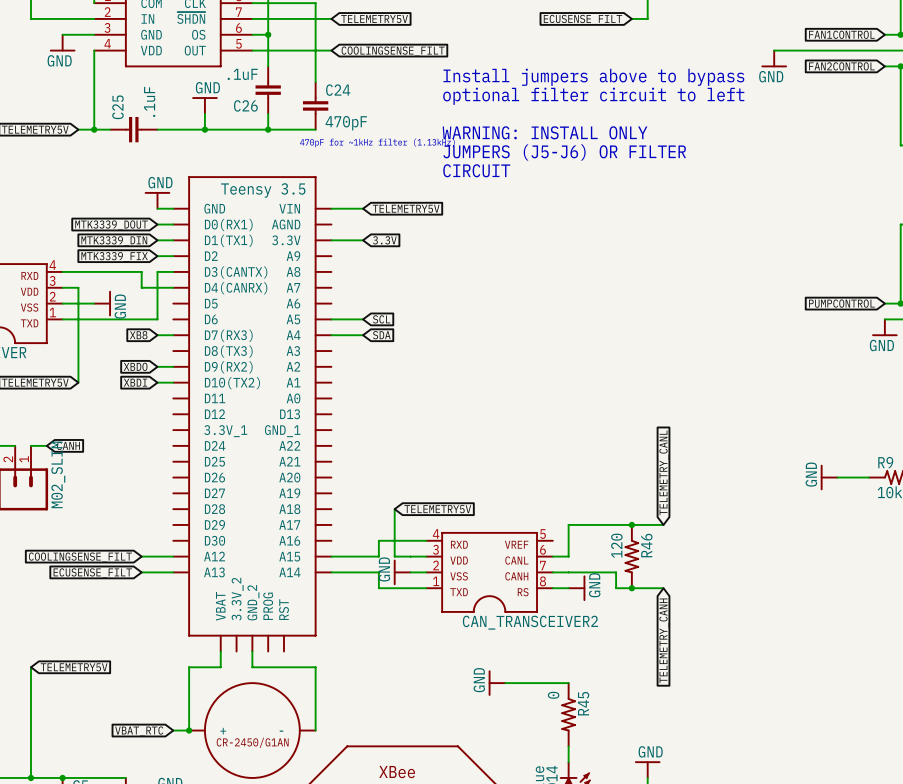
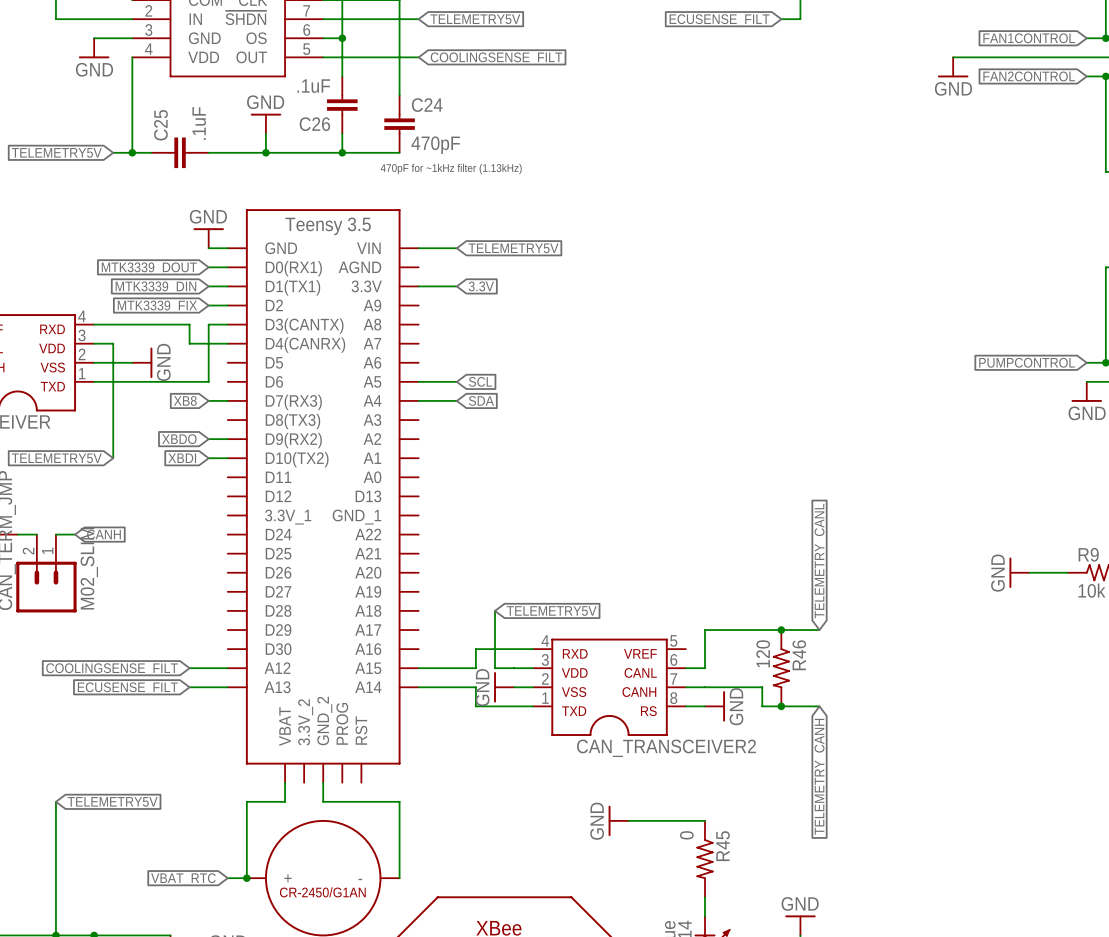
text: Install jumpers above to bypass (593, 77) -> none
text: optional filter circuit to left (593, 96) -> none
text: WARNING: INSTALL ONLY (545, 132) -> none
text: JUMPERS (J5-J6) OR FILTER (564, 152) -> none
text: CIRCUIT (476, 170) -> none

